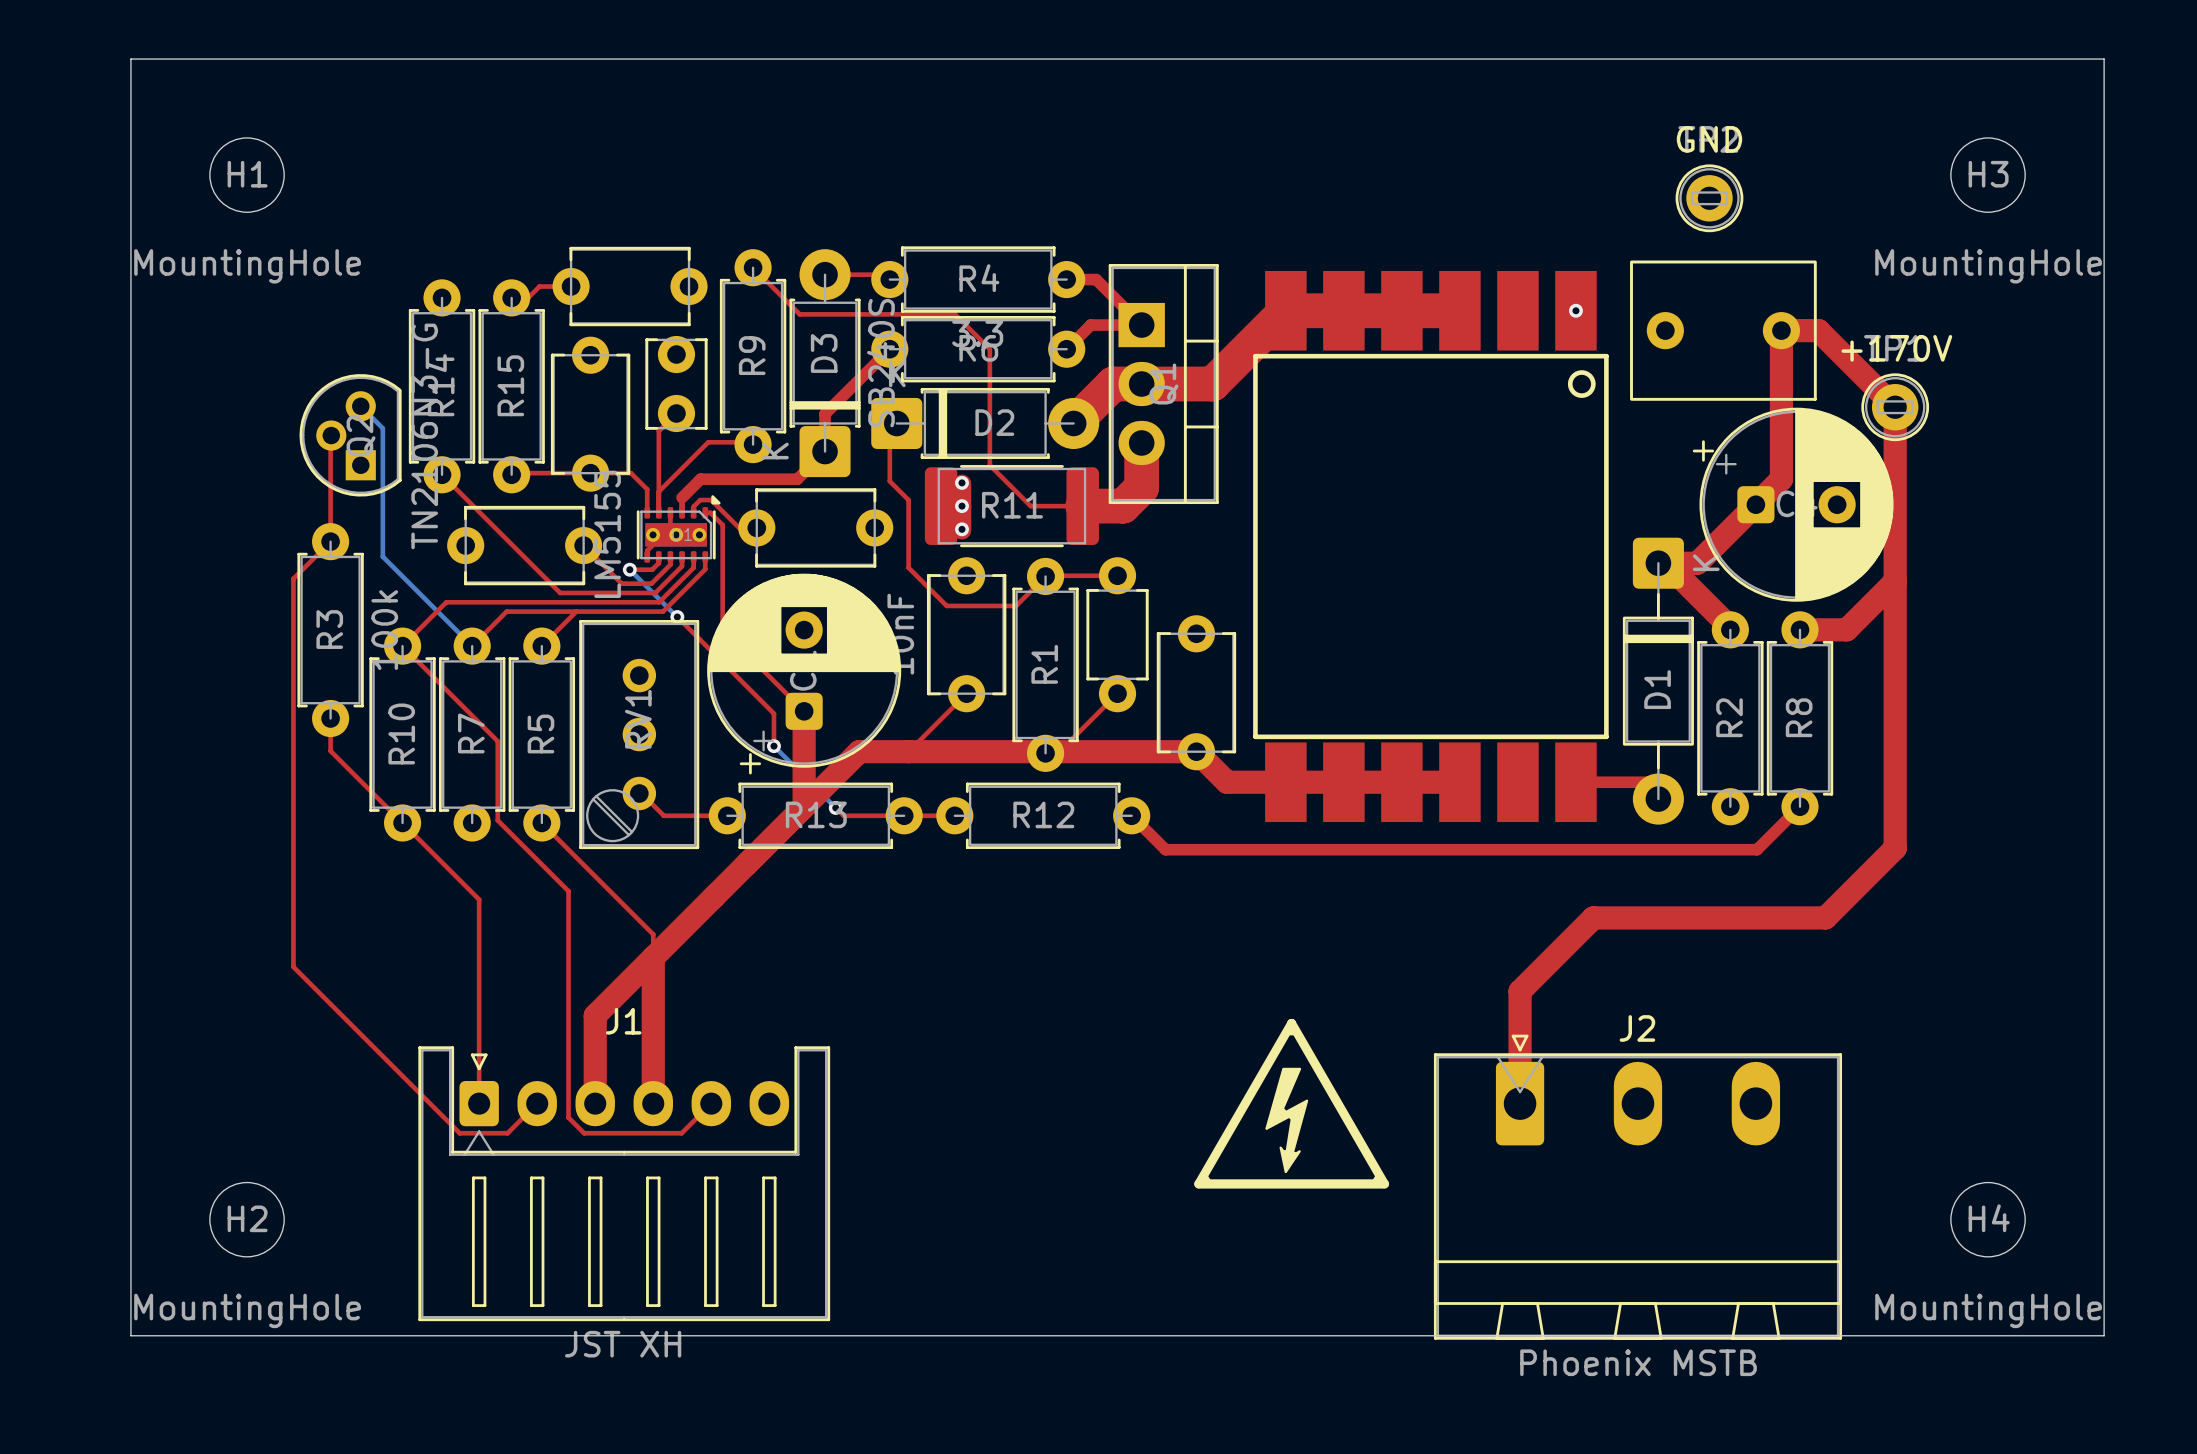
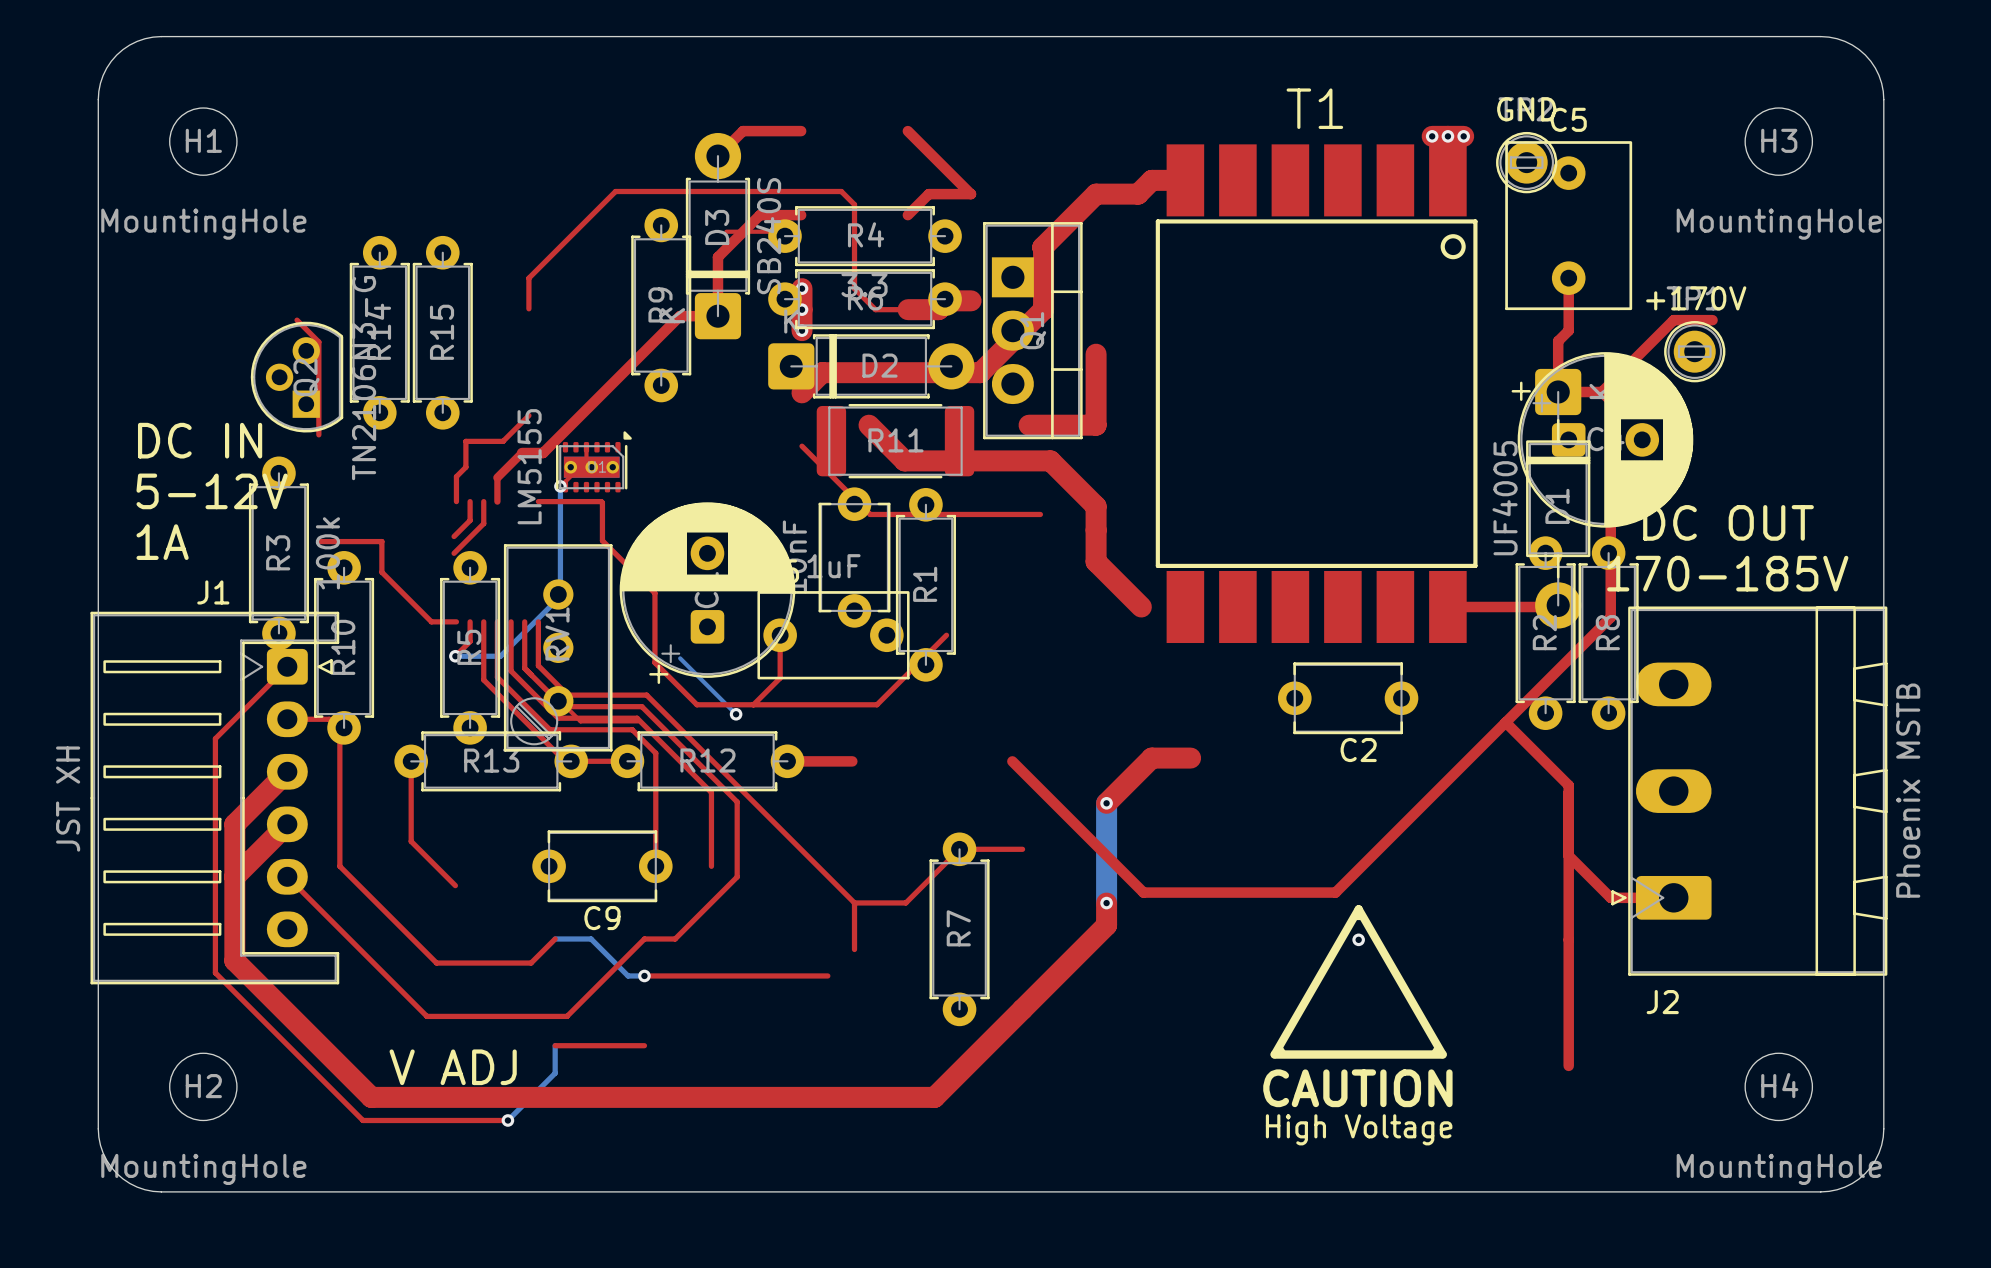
board edge: (200, 59) (130, 59) (130, 128) -> (161, 36) (137, 41) (116, 55) (103, 75) (98, 99)
board edge: (2034, 59) (2104, 59) (2104, 128) -> (1820, 36) (1844, 41) (1865, 55) (1879, 75) (1883, 99)
top track: none -> (801, 131) (742, 131) (717, 156)
top track: none -> (907, 131) (970, 194)
top track: none -> (1432, 136) (1463, 136)
via: none -> (1432, 136)
via: none -> (1447, 136)
via: none -> (1463, 136)
top track: none -> (1185, 180) (1151, 180) (1138, 194) (1096, 194) (1042, 247) (1043, 309) (980, 372) (822, 372) (802, 392)
top track: none -> (971, 194) (928, 194) (907, 215)
top track: none -> (801, 215) (759, 215) (717, 257) (717, 316) (679, 316) (543, 453) (522, 453) (497, 477) (497, 501)
top track: (753, 267) (799, 314) (955, 314) (989, 349) (989, 465) (1030, 506) (1123, 506) (1141, 487) (1141, 442) -> none
C5: none -> (1568, 225)
top track: (1066, 279) (1096, 279) (1141, 325) (1090, 325) (1066, 349) -> none
top track: (571, 286) (539, 286) (528, 297) (511, 297) -> none
part: (630, 286) -> none
top track: (1459, 310) (1285, 310) (1212, 384) (1113, 384) (1073, 423) -> none
via: (1575, 310) -> none
top track: none -> (1568, 278) (1568, 330) (1558, 341) (1558, 392) (1601, 392)
part: (1723, 330) -> none
via: none -> (802, 288)
top track: (889, 349) (825, 413) (825, 451) (797, 479) (700, 479) (682, 497) (682, 512) -> none
top track: none -> (971, 300) (947, 300) (938, 309) (875, 309) (854, 288) (854, 204) (841, 191) (615, 191) (528, 278) (528, 308)
via: none -> (802, 309)
D3 position: (825, 363) -> (717, 236)
top track: none -> (297, 320) (318, 342) (318, 434)
top track: none -> (1712, 320) (1673, 320) (1601, 392)
part: (676, 384) -> none
via: none -> (802, 330)
bottom track: (360, 406) (382, 428) (382, 556) (472, 646) -> none
top track: none -> (1096, 354) (1096, 425) (1029, 425)
top track: (676, 413) (658, 431) (658, 512) -> none
part: (590, 414) -> none
top track: (889, 430) (889, 481) (908, 500) (908, 567) (946, 605) (1016, 605) (1046, 575) (1117, 575) -> none
top track: (331, 435) (330, 541) (293, 578) (293, 966) (459, 1133) (507, 1133) (537, 1103) -> none
top track: (734, 442) (708, 442) (658, 491) -> none
top track: none -> (1601, 392) (1610, 400) (1610, 617) (1335, 892) (1143, 892) (1012, 761)
T1: none -> (1316, 393)
top track: (442, 474) (560, 592) (655, 592) (682, 566) (682, 556) -> none
top track: (511, 474) (513, 473) (630, 473) (647, 489) (647, 512) -> none
top track: none -> (528, 415) (503, 441) (465, 441) (465, 467) (456, 476) (456, 501)
via: (962, 482) -> none
top track: (962, 483) (962, 530) -> (802, 288) (802, 330)
top track: none -> (869, 425) (904, 460) (1050, 460) (1096, 506) (1096, 561) (1141, 607)
text: none -> DC IN (200, 440)
via: (962, 506) -> none
top track: none -> (802, 446) (870, 514) (1040, 514)
top track: (693, 512) (693, 506) (700, 500) (711, 500) (756, 545) -> none
top track: (705, 512) (710, 512) (722, 524) (722, 629) (804, 711) (804, 806) -> none
part: (815, 527) -> none
via: (962, 529) -> none
part: (524, 545) -> none
top track: (583, 545) (621, 583) (651, 583) (670, 564) (670, 556) -> none
part: (1430, 546) -> none
bottom track: none -> (560, 486) (560, 596) (500, 656) (455, 656)
top track: (658, 556) (658, 563) (652, 569) (629, 569) -> none
top track: (693, 556) (693, 567) (659, 602) (446, 602) (402, 646) (497, 741) (497, 820) (568, 891) (568, 1117) (584, 1133) (681, 1133) (711, 1103) -> none
top track: (705, 556) (705, 569) (663, 611) (506, 611) (472, 646) -> none
text: none -> 5-12V (212, 491)
bottom track: (629, 569) (677, 616) -> none
via position: (629, 569) -> (560, 486)
D1 value: none -> UF4005 (1505, 498)
top track: none -> (470, 501) (470, 520) (454, 536)
top track: none -> (483, 501) (483, 523) (454, 553)
top track: none -> (538, 501) (602, 502) (602, 540) (654, 593) (654, 662) (696, 704) (876, 704) (946, 635)
top track: (1895, 581) (1846, 629) (1800, 629) -> none
text: none -> DC OUT (1728, 522)
top track: (576, 611) (541, 646) -> none
top track: (677, 616) (773, 713) (773, 746) -> none
via: (677, 616) -> none
text: none -> 1A (162, 542)
top track: none -> (318, 541) (381, 541) (381, 572) (431, 621) (456, 621)
top track: (1730, 627) (1666, 563) (1658, 563) (1697, 563) (1781, 479) (1781, 330) (1818, 330) (1895, 407) (1895, 848) (1825, 917) (1593, 917) (1520, 991) (1520, 1103) -> none
part: (1117, 634) -> none
text: none -> 170-185V (1727, 573)
D1 position: (1658, 681) -> (1558, 498)
top track: none -> (1558, 605) (1556, 607) (1447, 607)
part: (1196, 692) -> none
top track: (966, 693) (908, 751) -> none
top track: (1117, 693) (1057, 753) -> none
top track: none -> (470, 621) (470, 641) (455, 656)
top track: none -> (483, 621) (483, 679) (565, 761) (627, 761)
top track: none -> (497, 621) (497, 677) (549, 729) (632, 729) (655, 753) (655, 866)
top track: none -> (511, 621) (511, 671) (558, 718) (637, 718) (711, 792) (711, 866)
top track: none -> (524, 621) (524, 668) (562, 706) (641, 706) (737, 801) (737, 876) (675, 939) (644, 939) (567, 1016) (426, 1016) (287, 876)
top track: none -> (538, 621) (538, 665) (567, 695) (646, 695) (854, 902)
top track: (330, 718) (330, 751) (479, 899) (479, 1103) -> none
top track: none -> (780, 635) (780, 678) (753, 704)
part: none -> 1uF (833, 635)
R7 position: (472, 734) -> (959, 929)
via: none -> (455, 656)
via: (773, 746) -> none
top track: none -> (287, 666) (215, 738) (215, 972) (362, 1120) (507, 1120)
top track: (1459, 782) (1226, 782) (1196, 751) (859, 751) (595, 1015) (595, 1103) -> none
top track: (1575, 782) (1662, 782) -> none
C2: none -> (1348, 698)
top track: (1800, 806) (1757, 849) (1165, 849) (1131, 815) -> none
top track: (835, 807) (843, 815) (954, 815) -> none
top track: none -> (287, 719) (329, 719) (339, 729) (339, 866) (436, 963) (531, 963) (555, 939)
R13 position: (815, 815) -> (491, 761)
R12 position: (1043, 815) -> (707, 761)
top track: none -> (1505, 722) (1568, 785) (1568, 1065)
top track: (541, 822) (653, 934) (653, 1103) -> none
top track: none -> (1190, 758) (1151, 758) (1106, 803)
top track: none -> (411, 761) (411, 841) (455, 885)
top track: none -> (787, 761) (852, 761)
top track: none -> (287, 771) (234, 824) (234, 960) (371, 1097) (934, 1097) (1106, 925) (1106, 903)
bottom track: none -> (1106, 803) (1106, 903)
via: none -> (1106, 803)
top track: none -> (287, 824) (234, 876)
top track: none -> (1022, 849) (959, 849) (905, 902) (854, 902)
top track: none -> (1568, 855) (1610, 897) (1673, 897)
C9: none -> (602, 866)
top track: none -> (854, 902) (854, 949)
via: none -> (1106, 903)
drawing: [1194, 1018, 1390, 1189] -> none
drawing: none -> [1270, 905, 1447, 1059]
J1 name position: J1 (623, 1021) -> J1 (213, 592)
J2 name position: J2 (1637, 1028) -> J2 (1662, 1002)
bottom track: none -> (555, 939) (591, 939) (628, 975) (644, 975)
via: none -> (1358, 939)
top track: none -> (644, 975) (827, 975)
via: none -> (644, 975)
top track: none -> (555, 1045) (644, 1045)
bottom track: none -> (555, 1045) (555, 1073) (507, 1120)
J1 rotation: 0° (624, 1183) -> 90° clockwise (214, 798)
J1 position: (624, 1183) -> (214, 798)
J2 rotation: 0° (1637, 1187) -> 90° counterclockwise (1749, 791)
J2 position: (1637, 1187) -> (1749, 791)
text: none -> V ADJ (453, 1067)
via: none -> (507, 1120)
board edge: (130, 1266) (130, 1335) (200, 1335) -> (98, 1128) (103, 1153) (116, 1173) (137, 1187) (161, 1191)
board edge: (2104, 1266) (2104, 1335) (2034, 1335) -> (1883, 1128) (1879, 1153) (1865, 1173) (1844, 1187) (1820, 1191)

